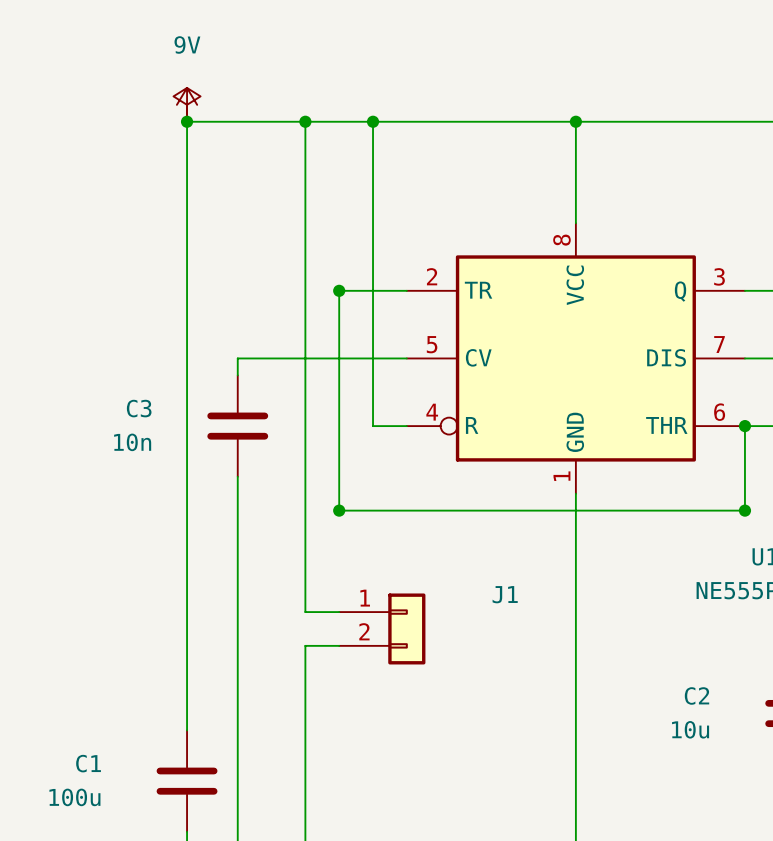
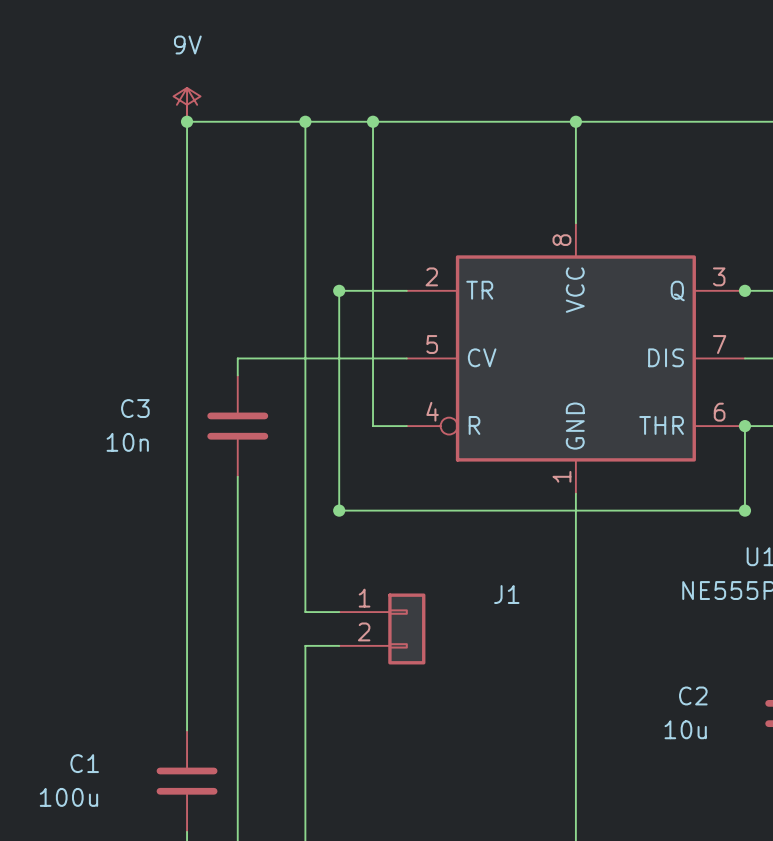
junction: none -> (744, 290)

